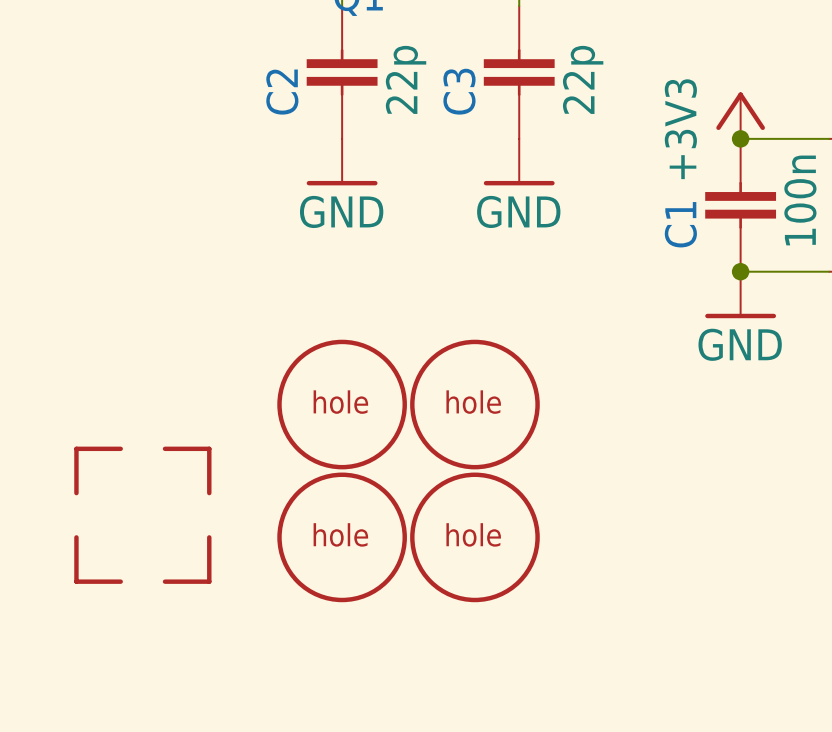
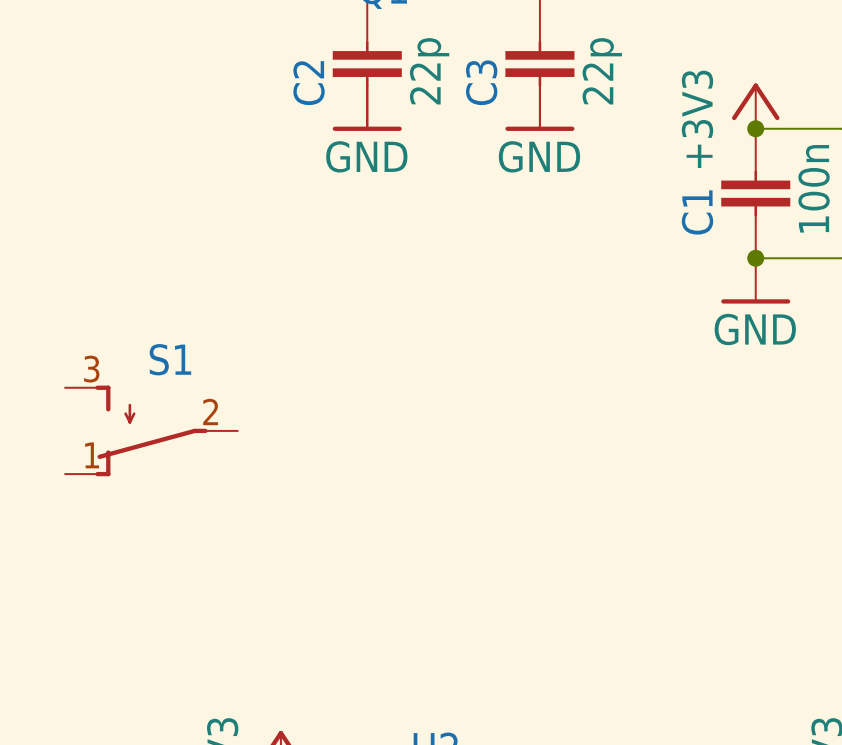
power symbol position: GND (342, 162) -> GND (367, 108)
power symbol position: GND (519, 162) -> GND (539, 108)
part: (342, 404) -> none
part: (474, 404) -> none
S1: none -> (151, 430)
part: (98, 470) -> none
part: (187, 470) -> none
part: (342, 537) -> none
part: (474, 537) -> none
part: (98, 559) -> none
part: (187, 559) -> none

